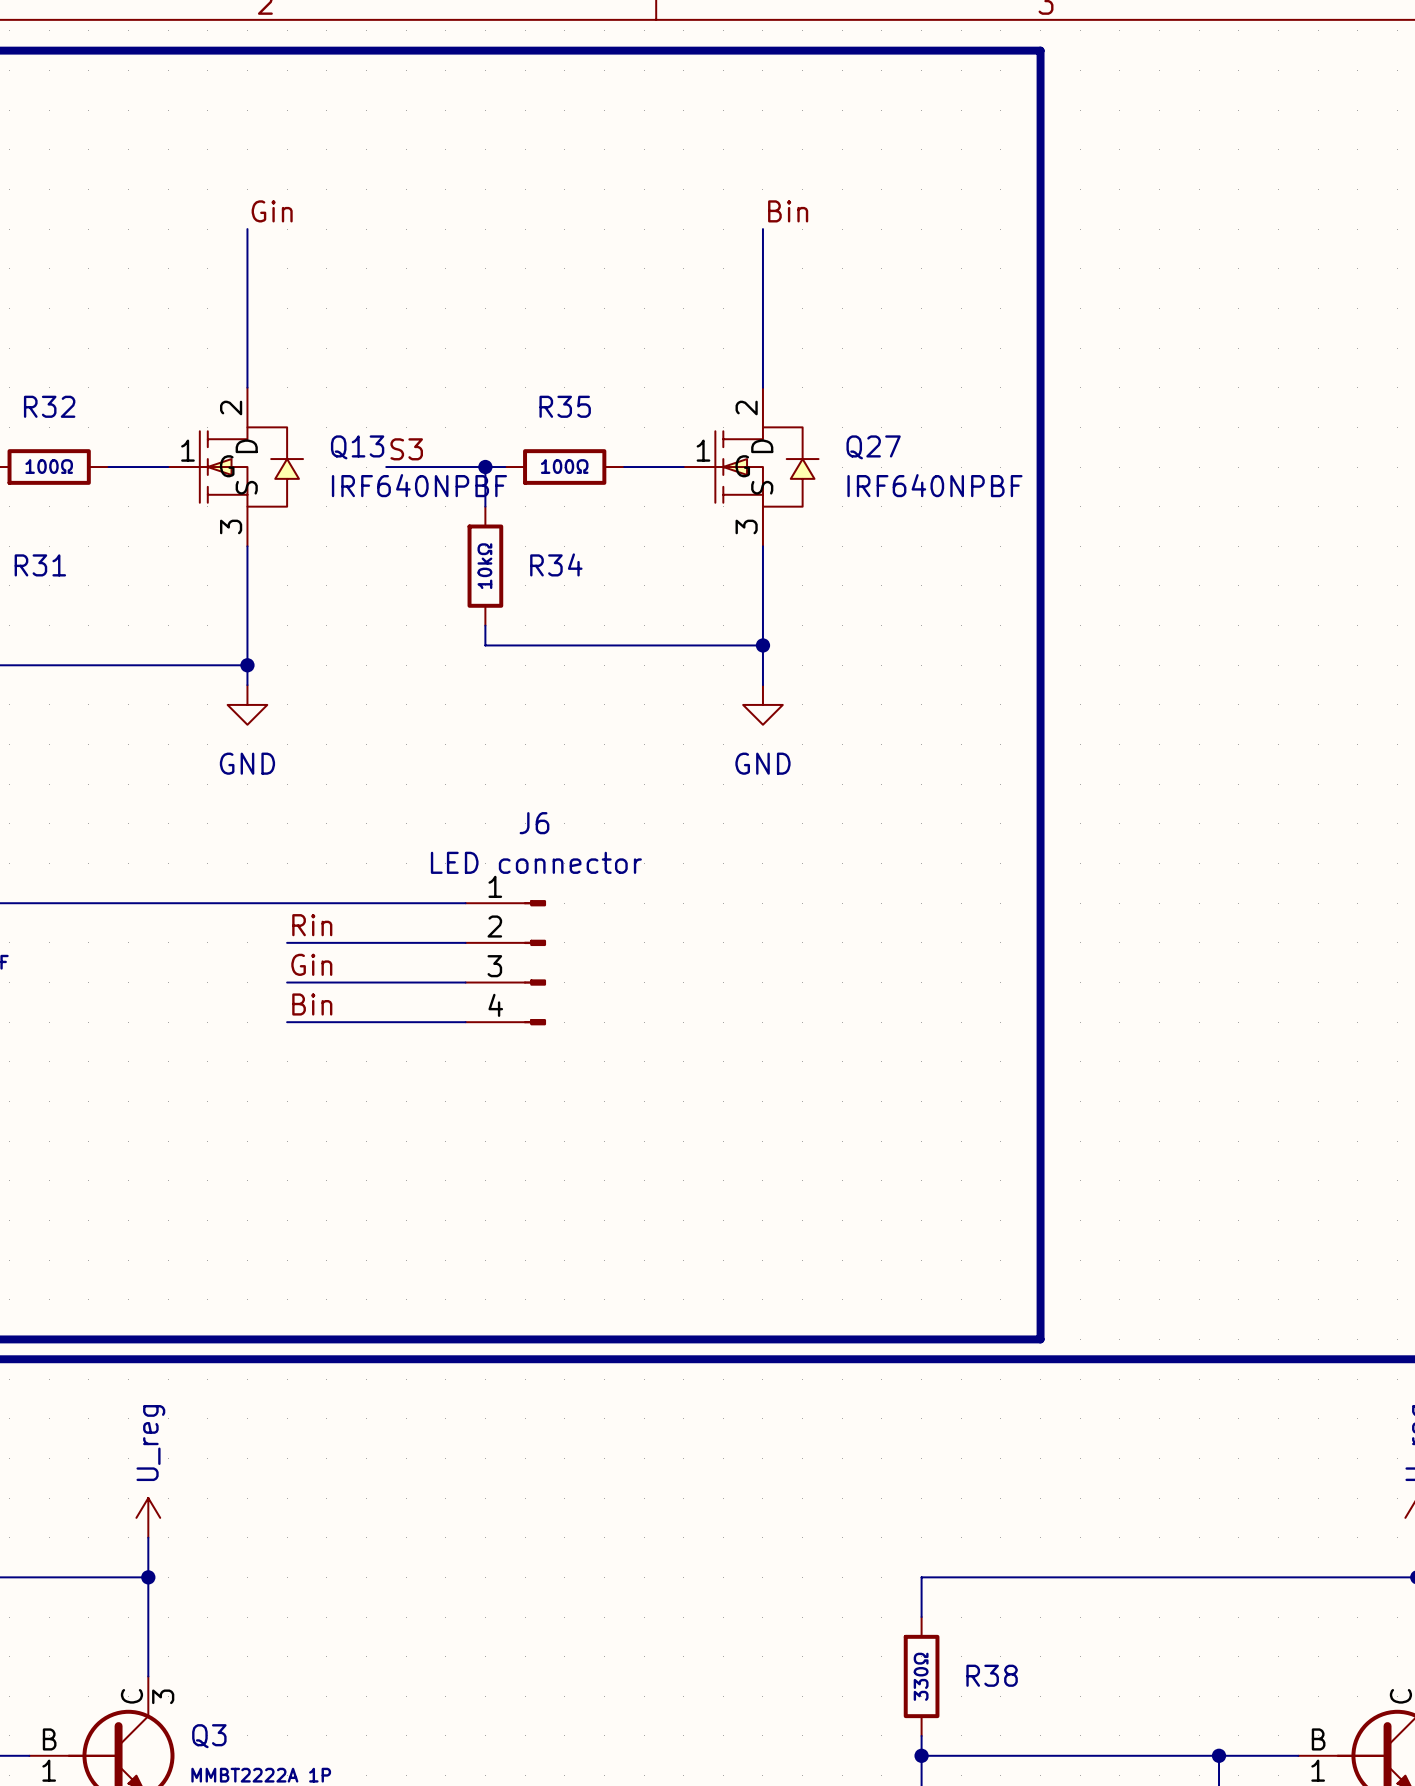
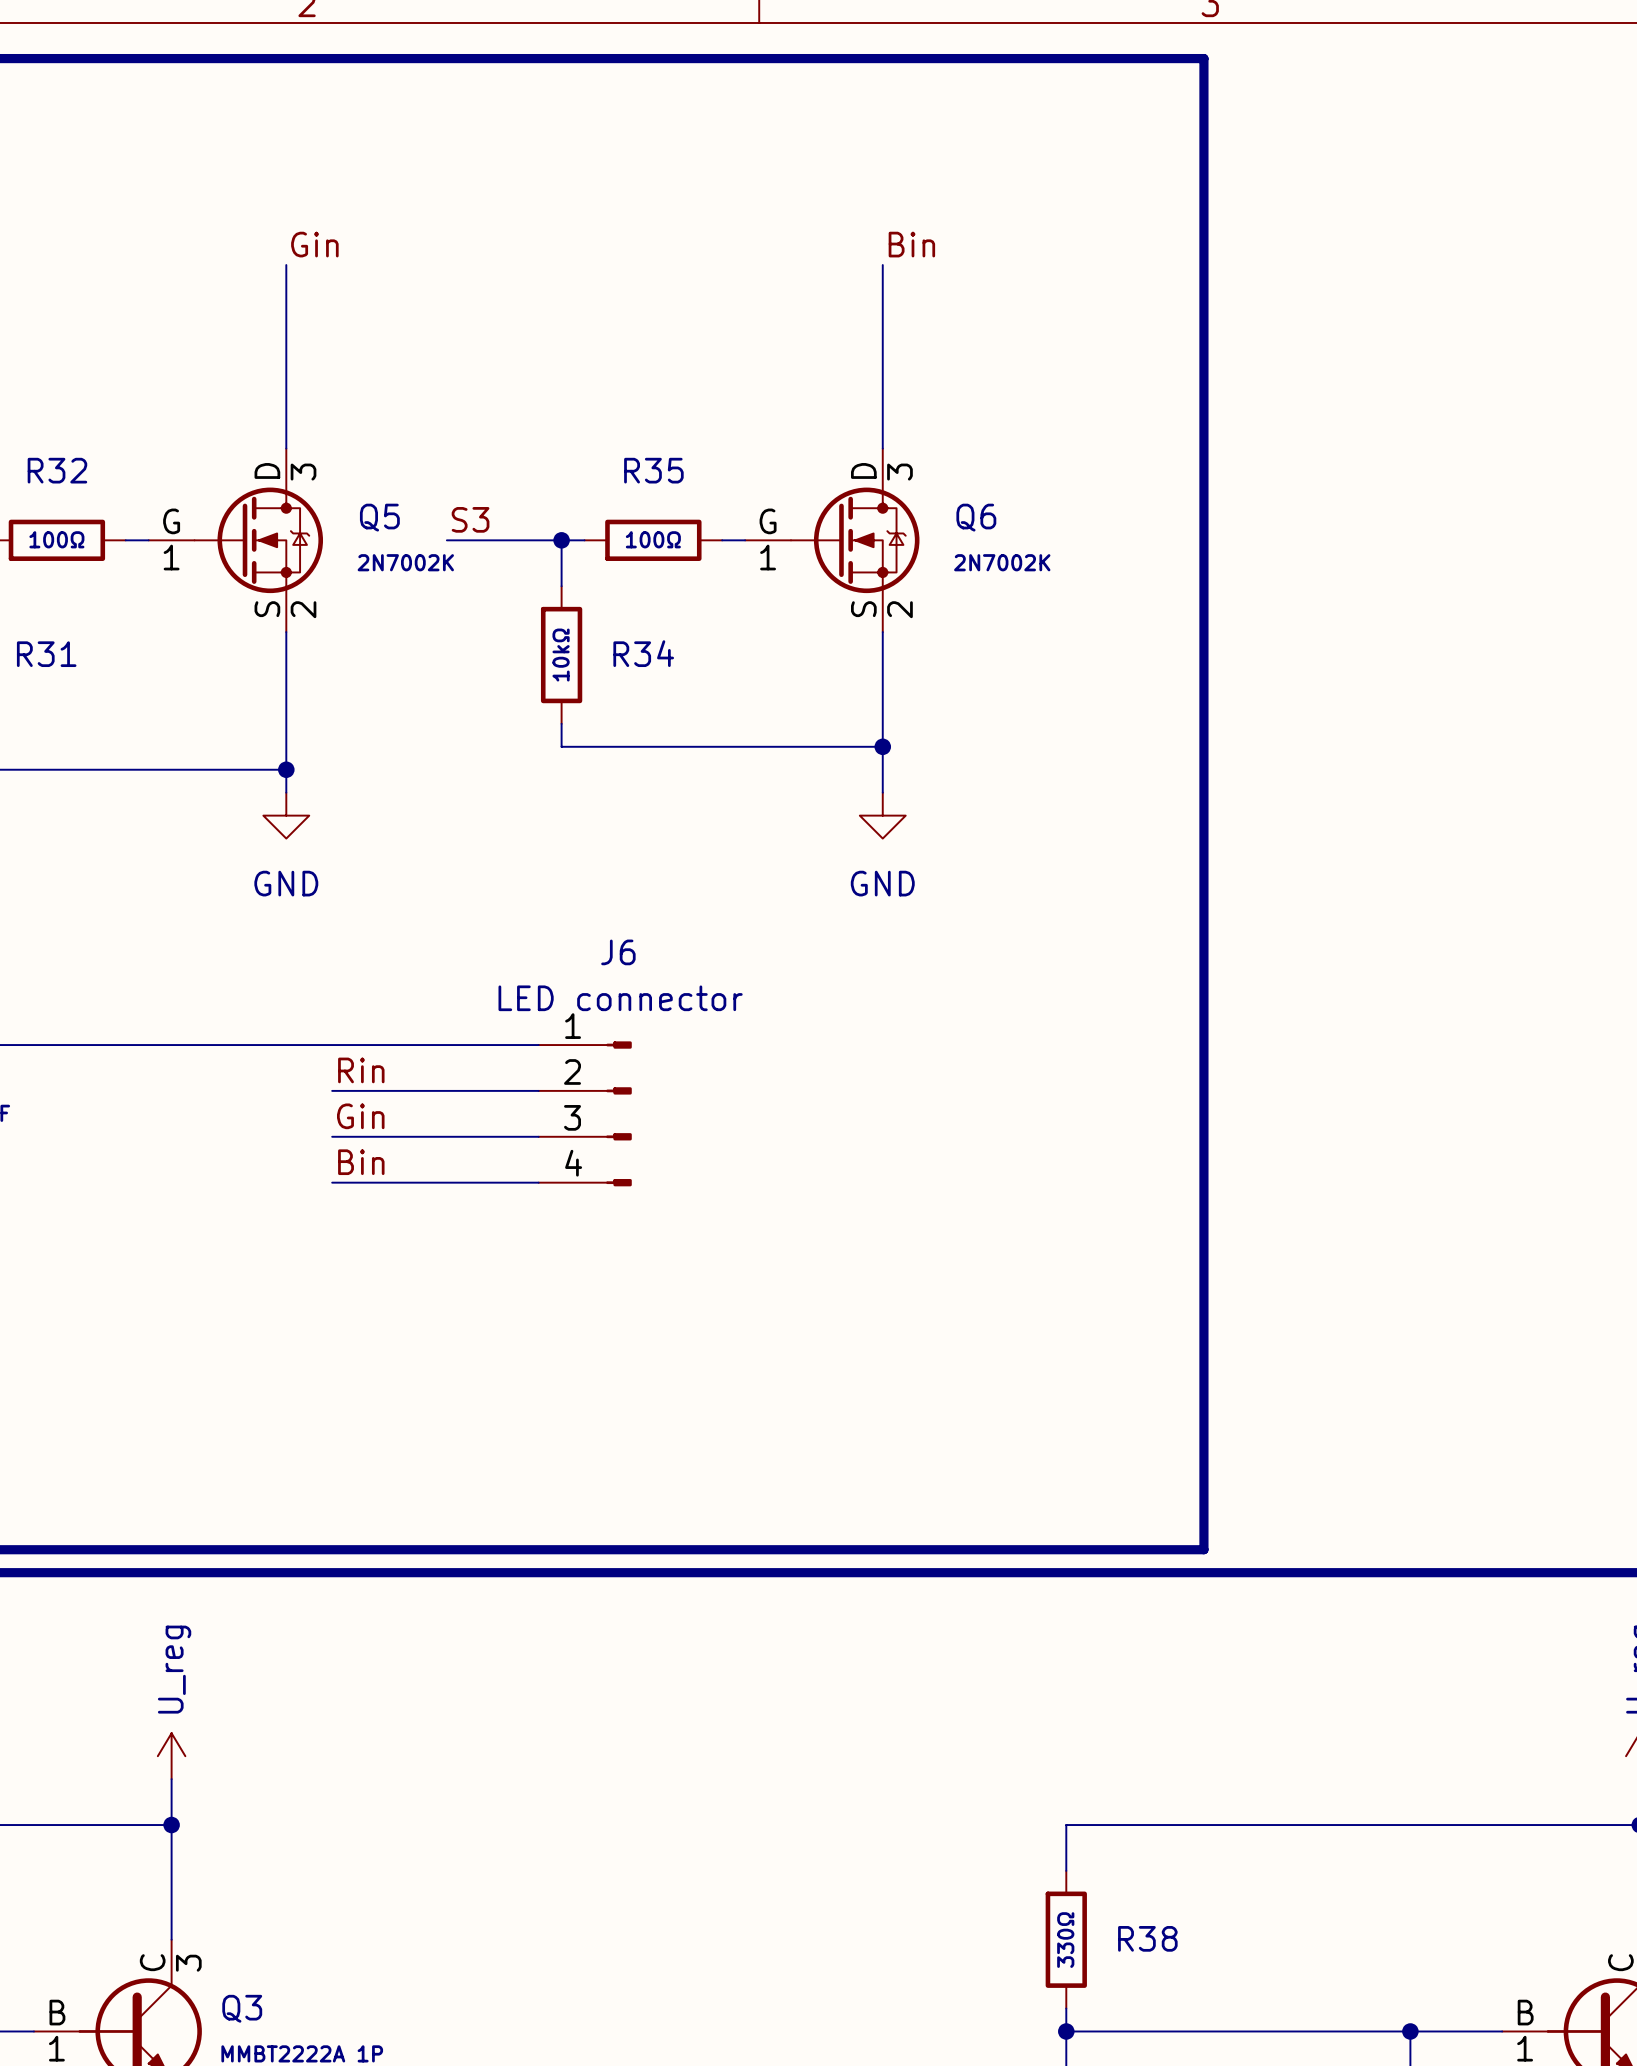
Q5: none -> 2N7002K (235, 540)
Q13: IRF640NPBF (235, 467) -> none
Q6: none -> 2N7002K (832, 540)
Q27: IRF640NPBF (751, 467) -> none

